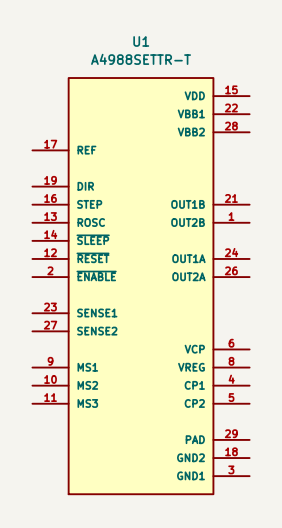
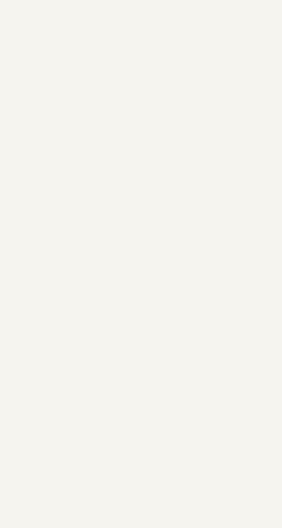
U1: A4988SETTR-T (141, 286) -> none

